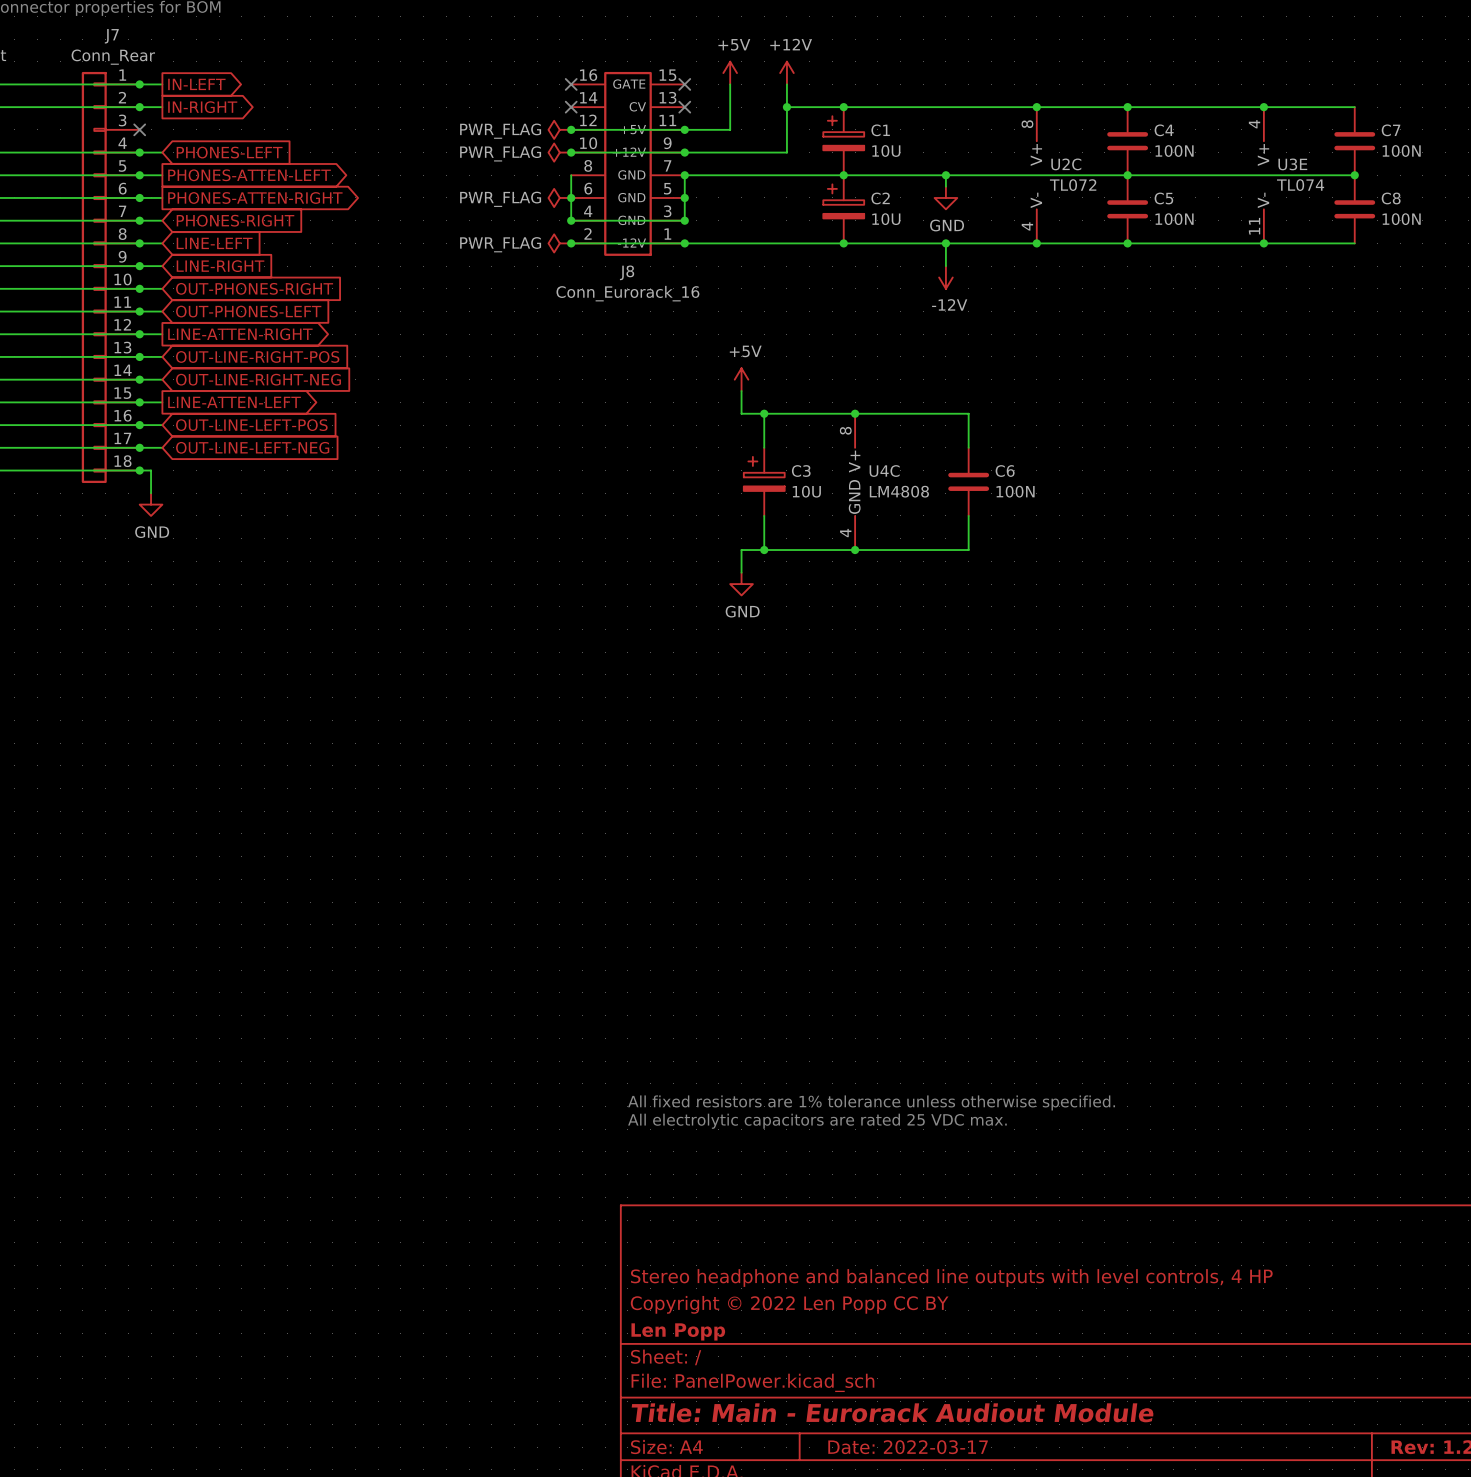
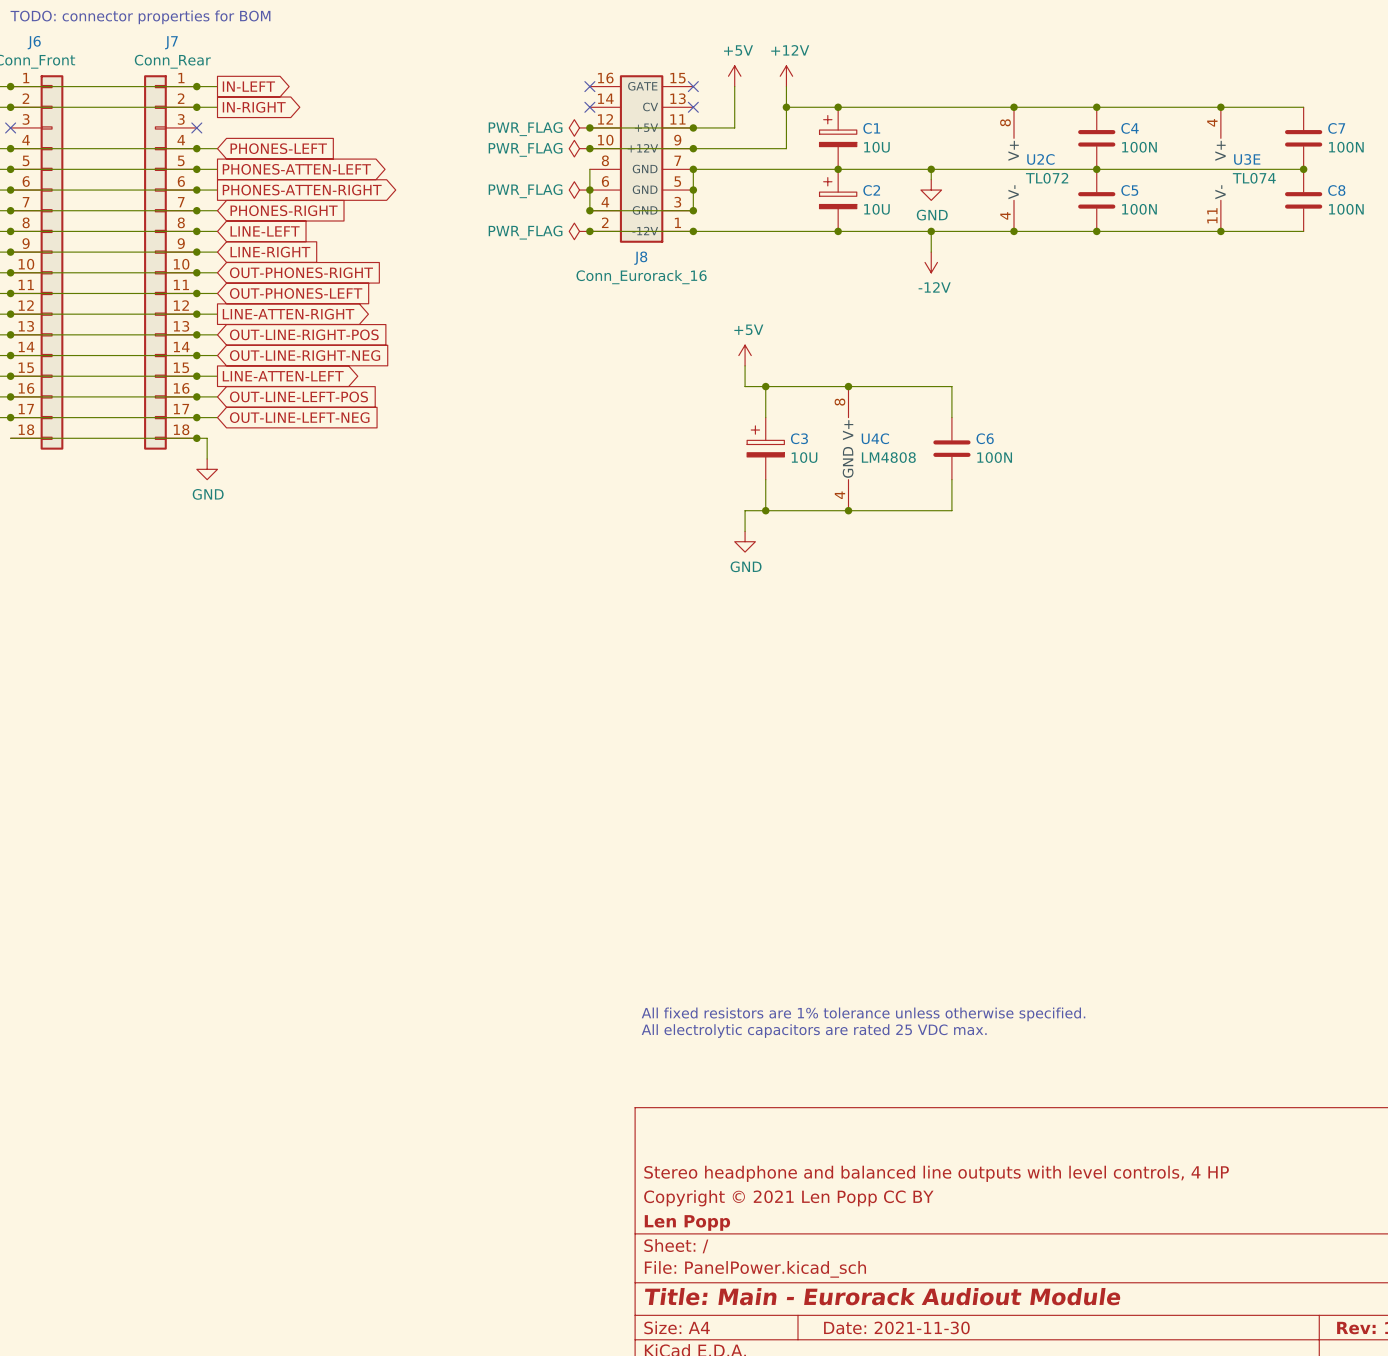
title block: Copyright © 2022 Len Popp CC BY (789, 1304) -> Copyright © 2021 Len Popp CC BY (788, 1198)
title block: Date: 2022-03-17 (908, 1447) -> Date: 2021-11-30 (896, 1327)

